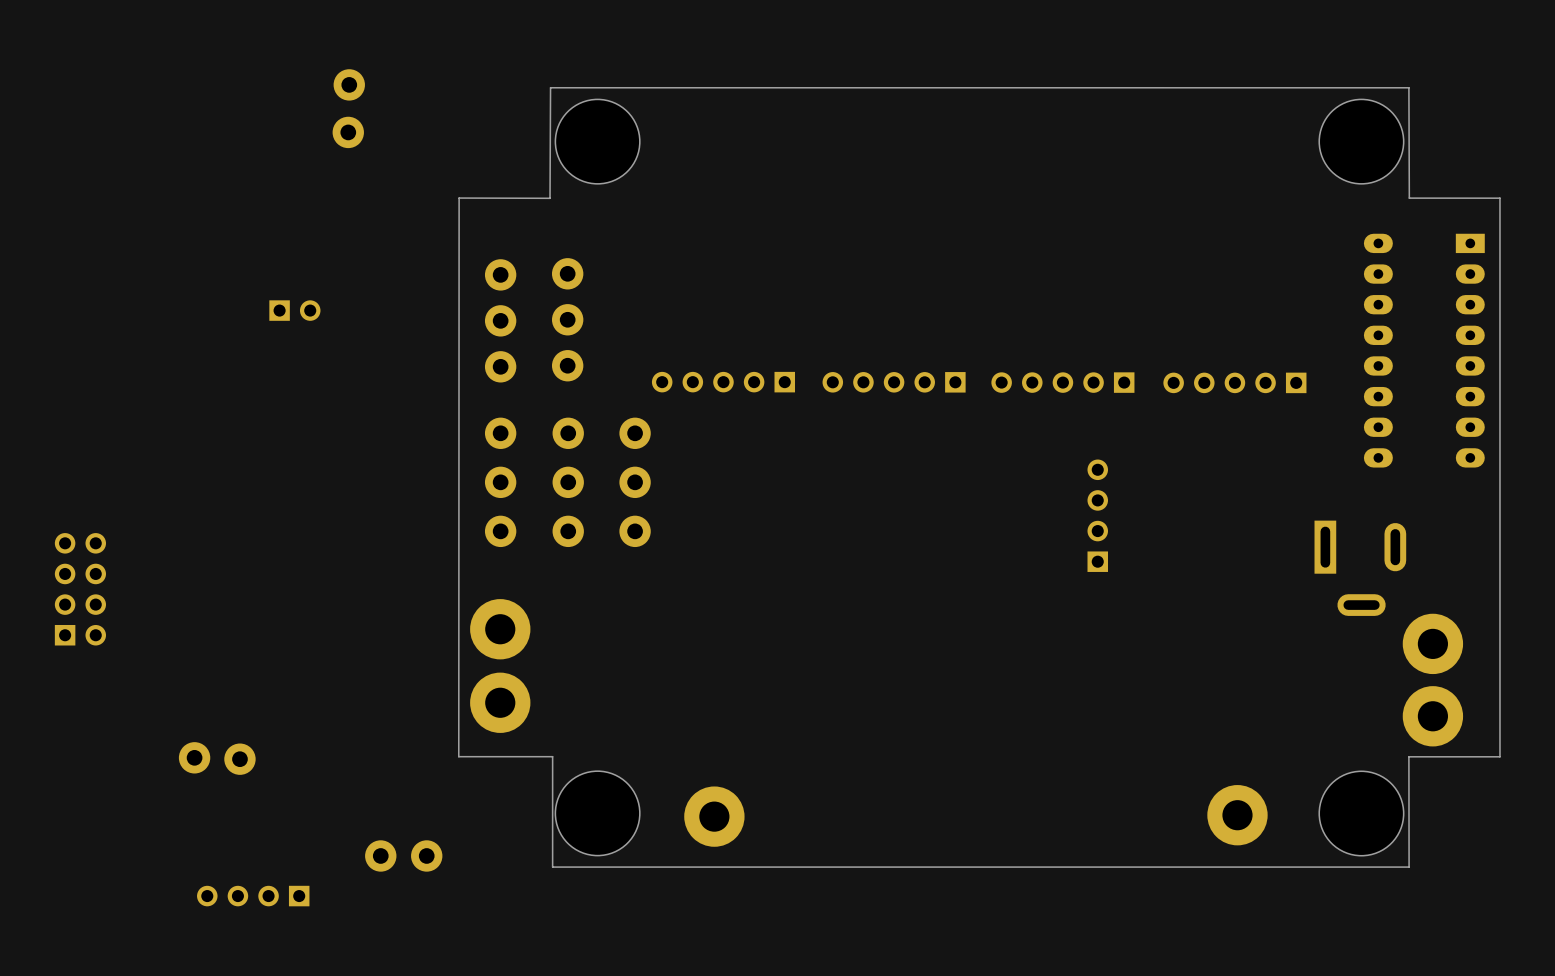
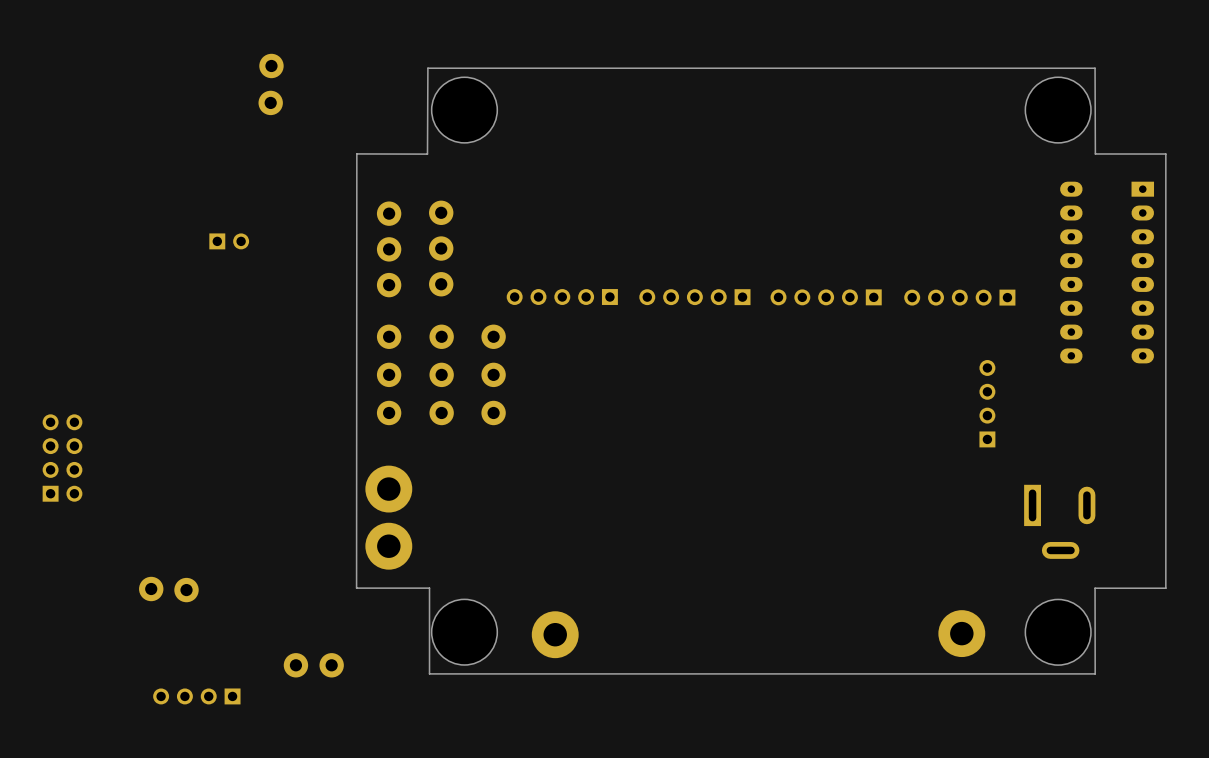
part position: (1097, 515) -> (987, 403)
part position: (1360, 568) -> (1059, 521)
part: (1432, 643) -> none
part: (1432, 716) -> none

